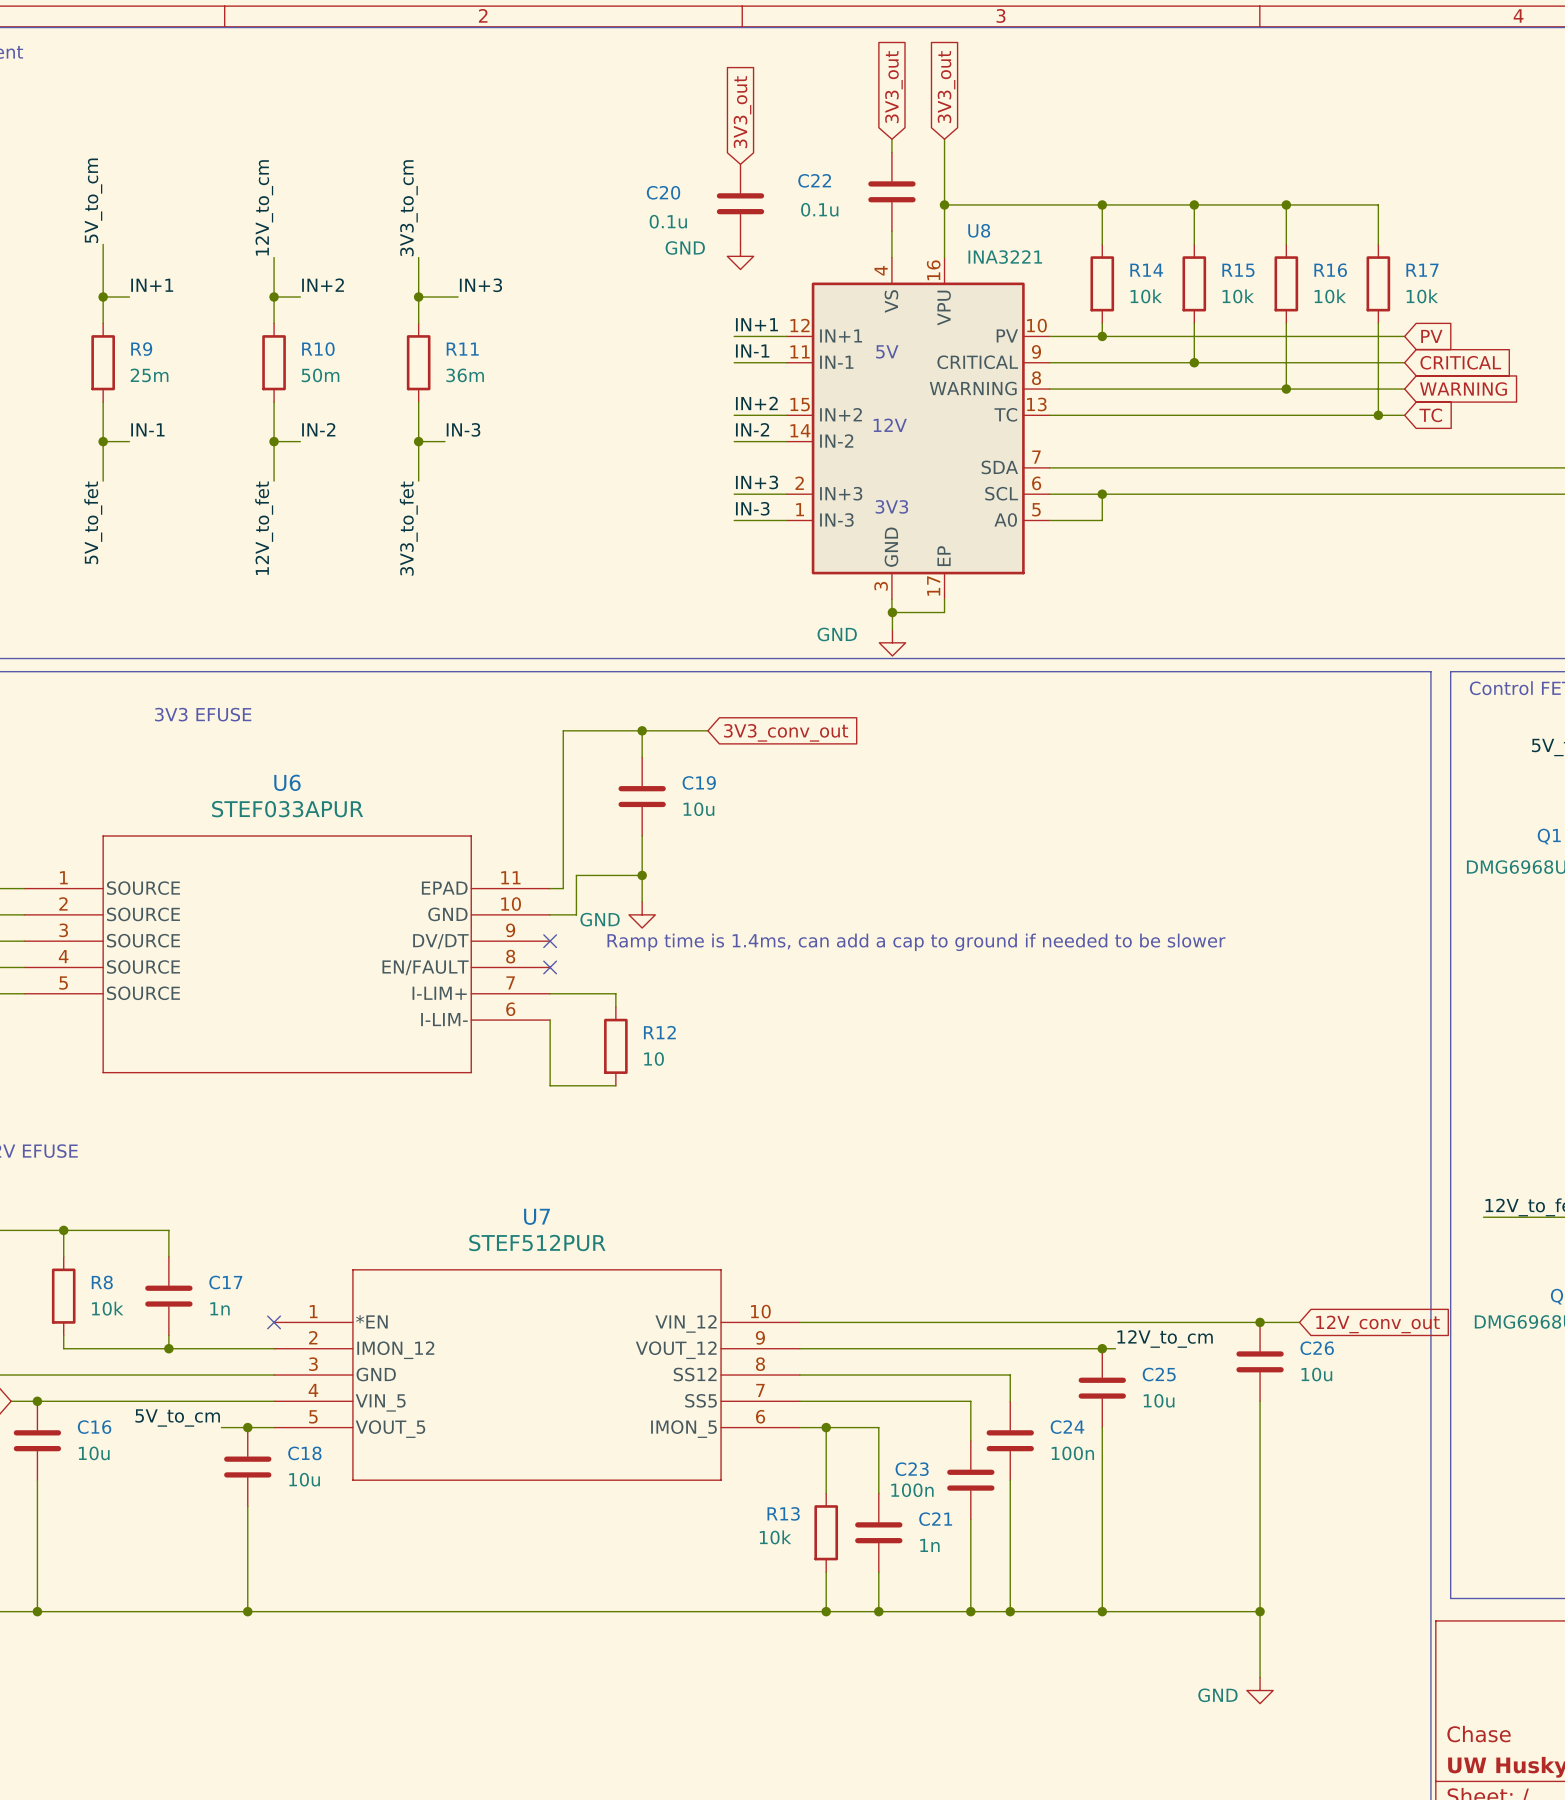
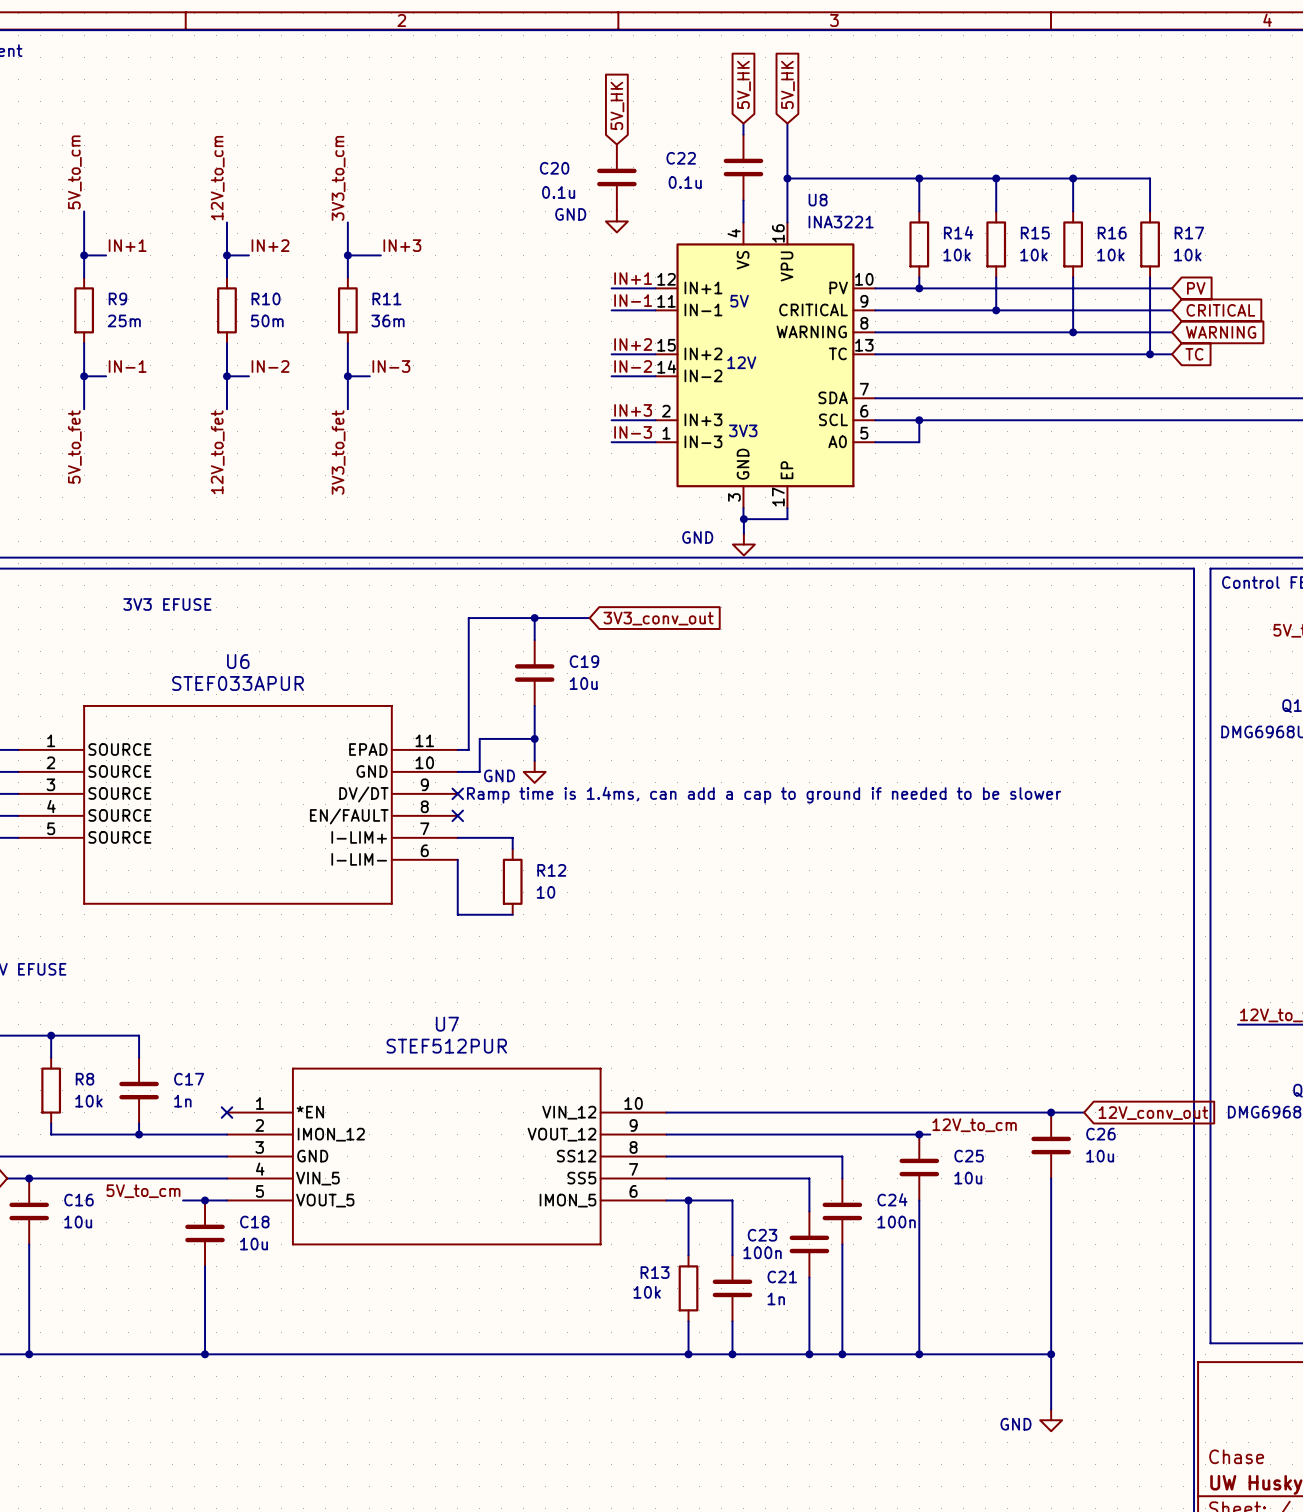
global label: 3V3_out (893, 87) -> 5V_HK (743, 84)
global label: 3V3_out (946, 87) -> 5V_HK (787, 84)
global label: 3V3_out (742, 112) -> 5V_HK (617, 105)

